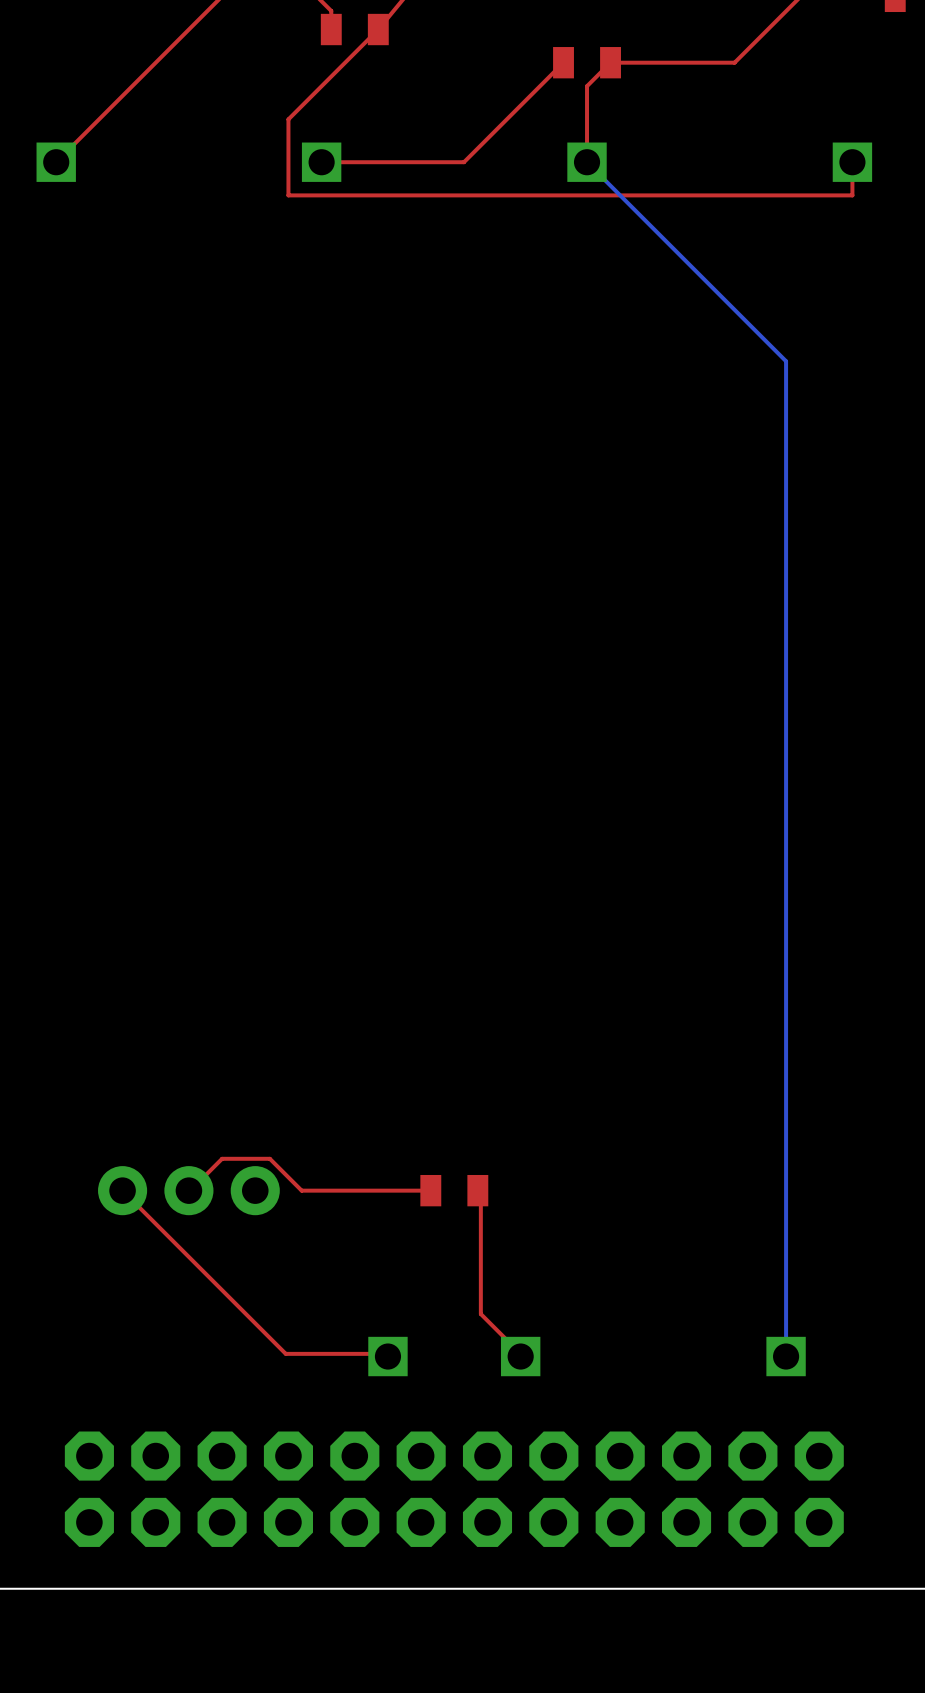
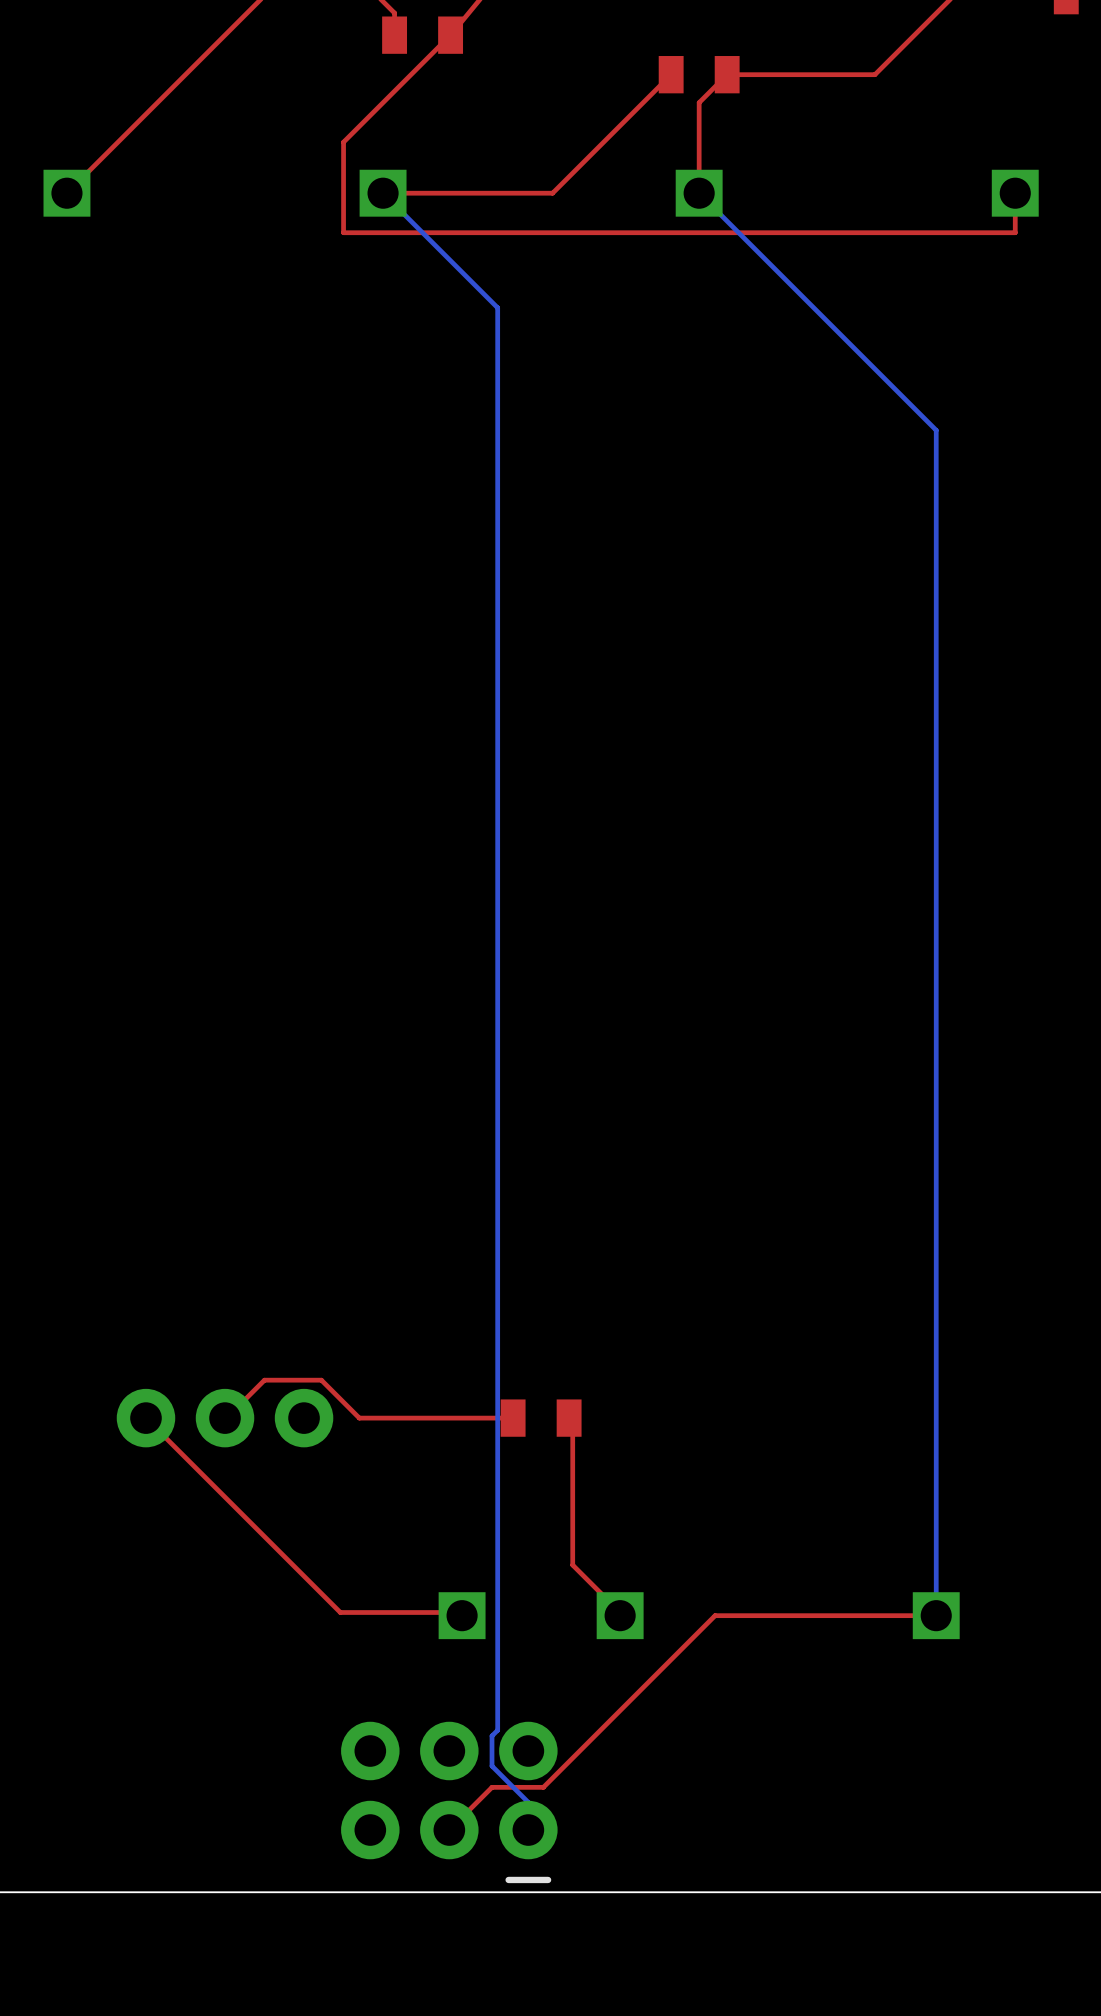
bottom track: none -> (383, 193) (497, 307) (497, 1730) (492, 1735) (492, 1766) (528, 1802) (528, 1830)
top track: none -> (936, 1615) (715, 1615) (543, 1787) (492, 1787) (449, 1830)
part: (454, 1489) -> none
part: none -> (449, 1802)

